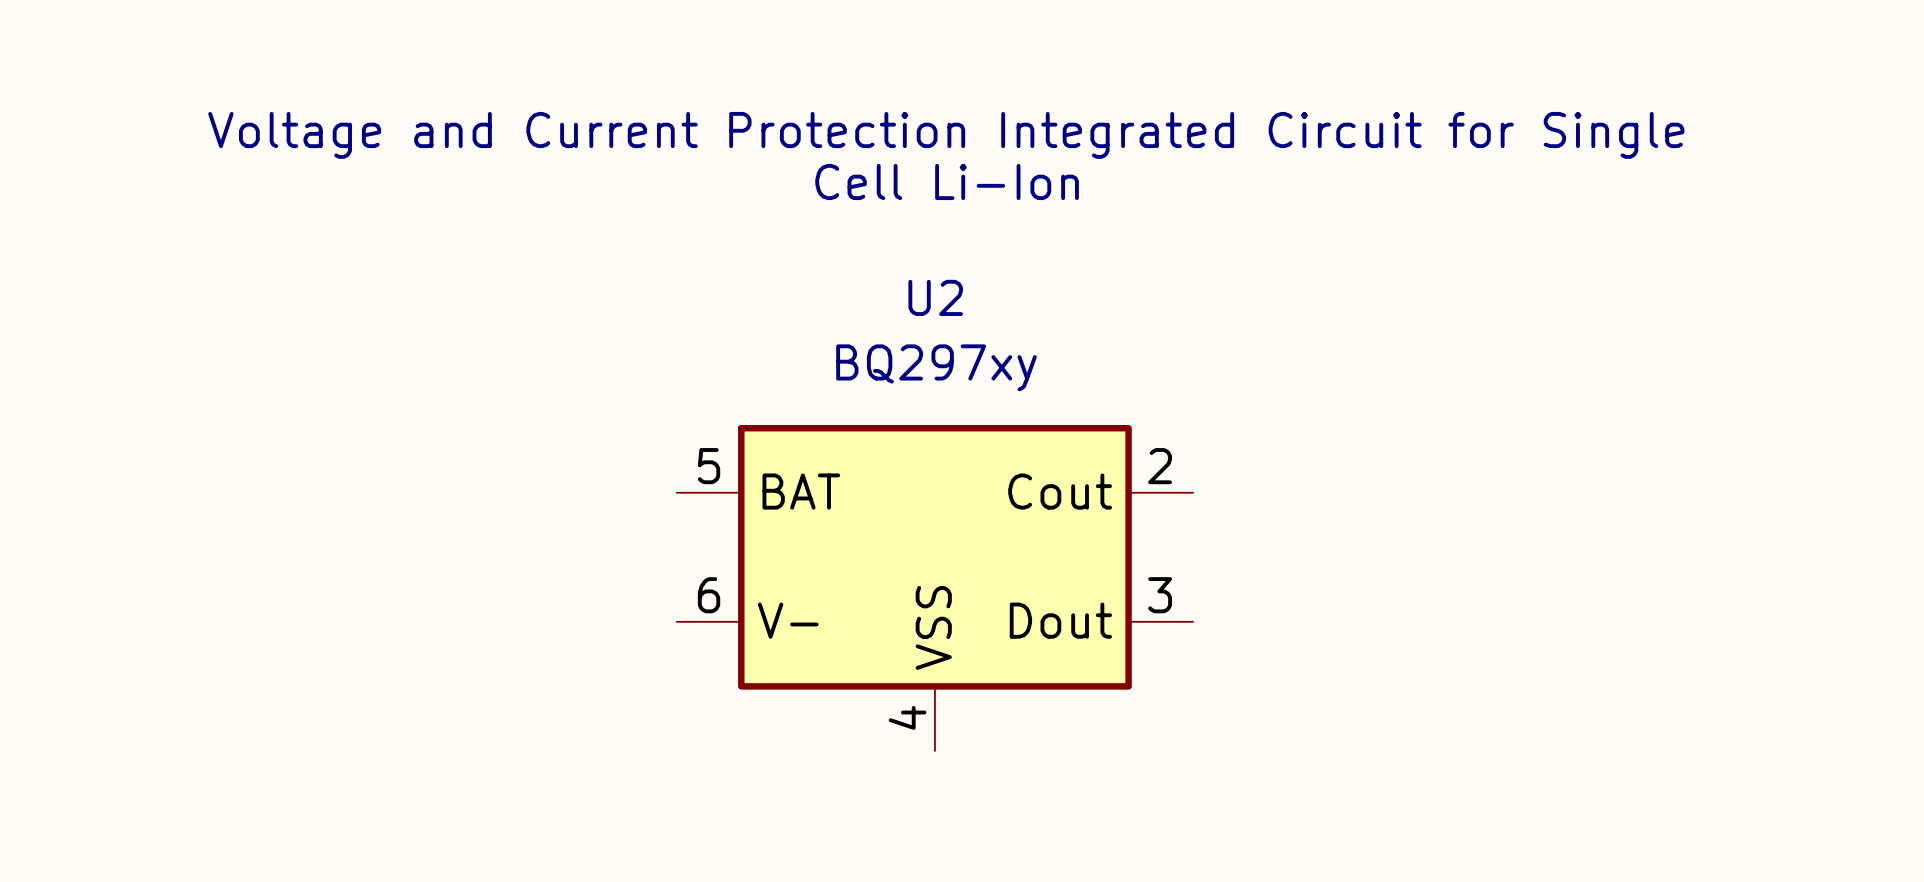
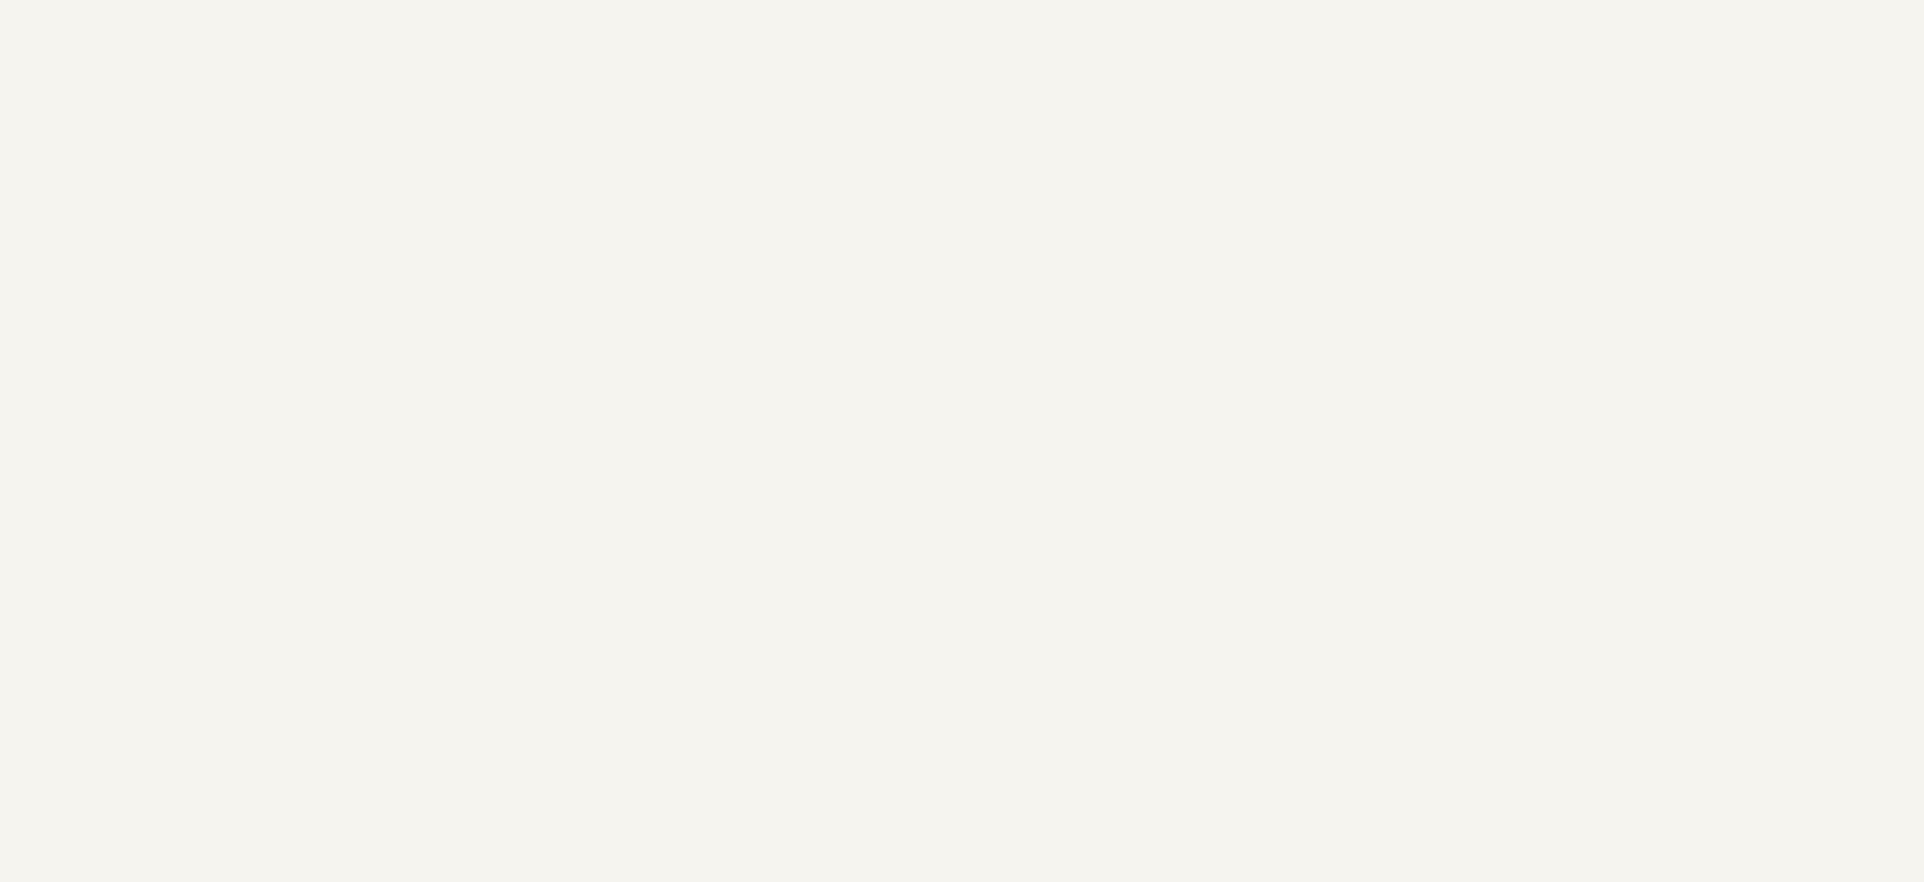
text: Voltage and Current Protection Integrated Circuit for Single (946, 135) -> none
text: Cell Li-Ion (947, 181) -> none
U2: BQ297xy (934, 587) -> none

